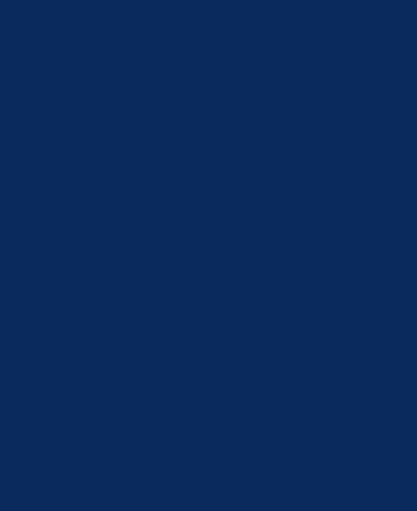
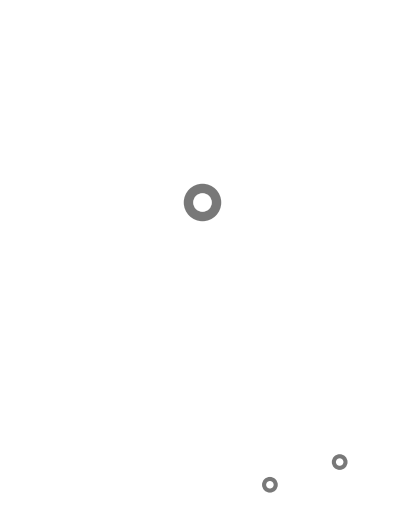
via: none -> (202, 202)
via: none -> (339, 462)
via: none -> (269, 484)

